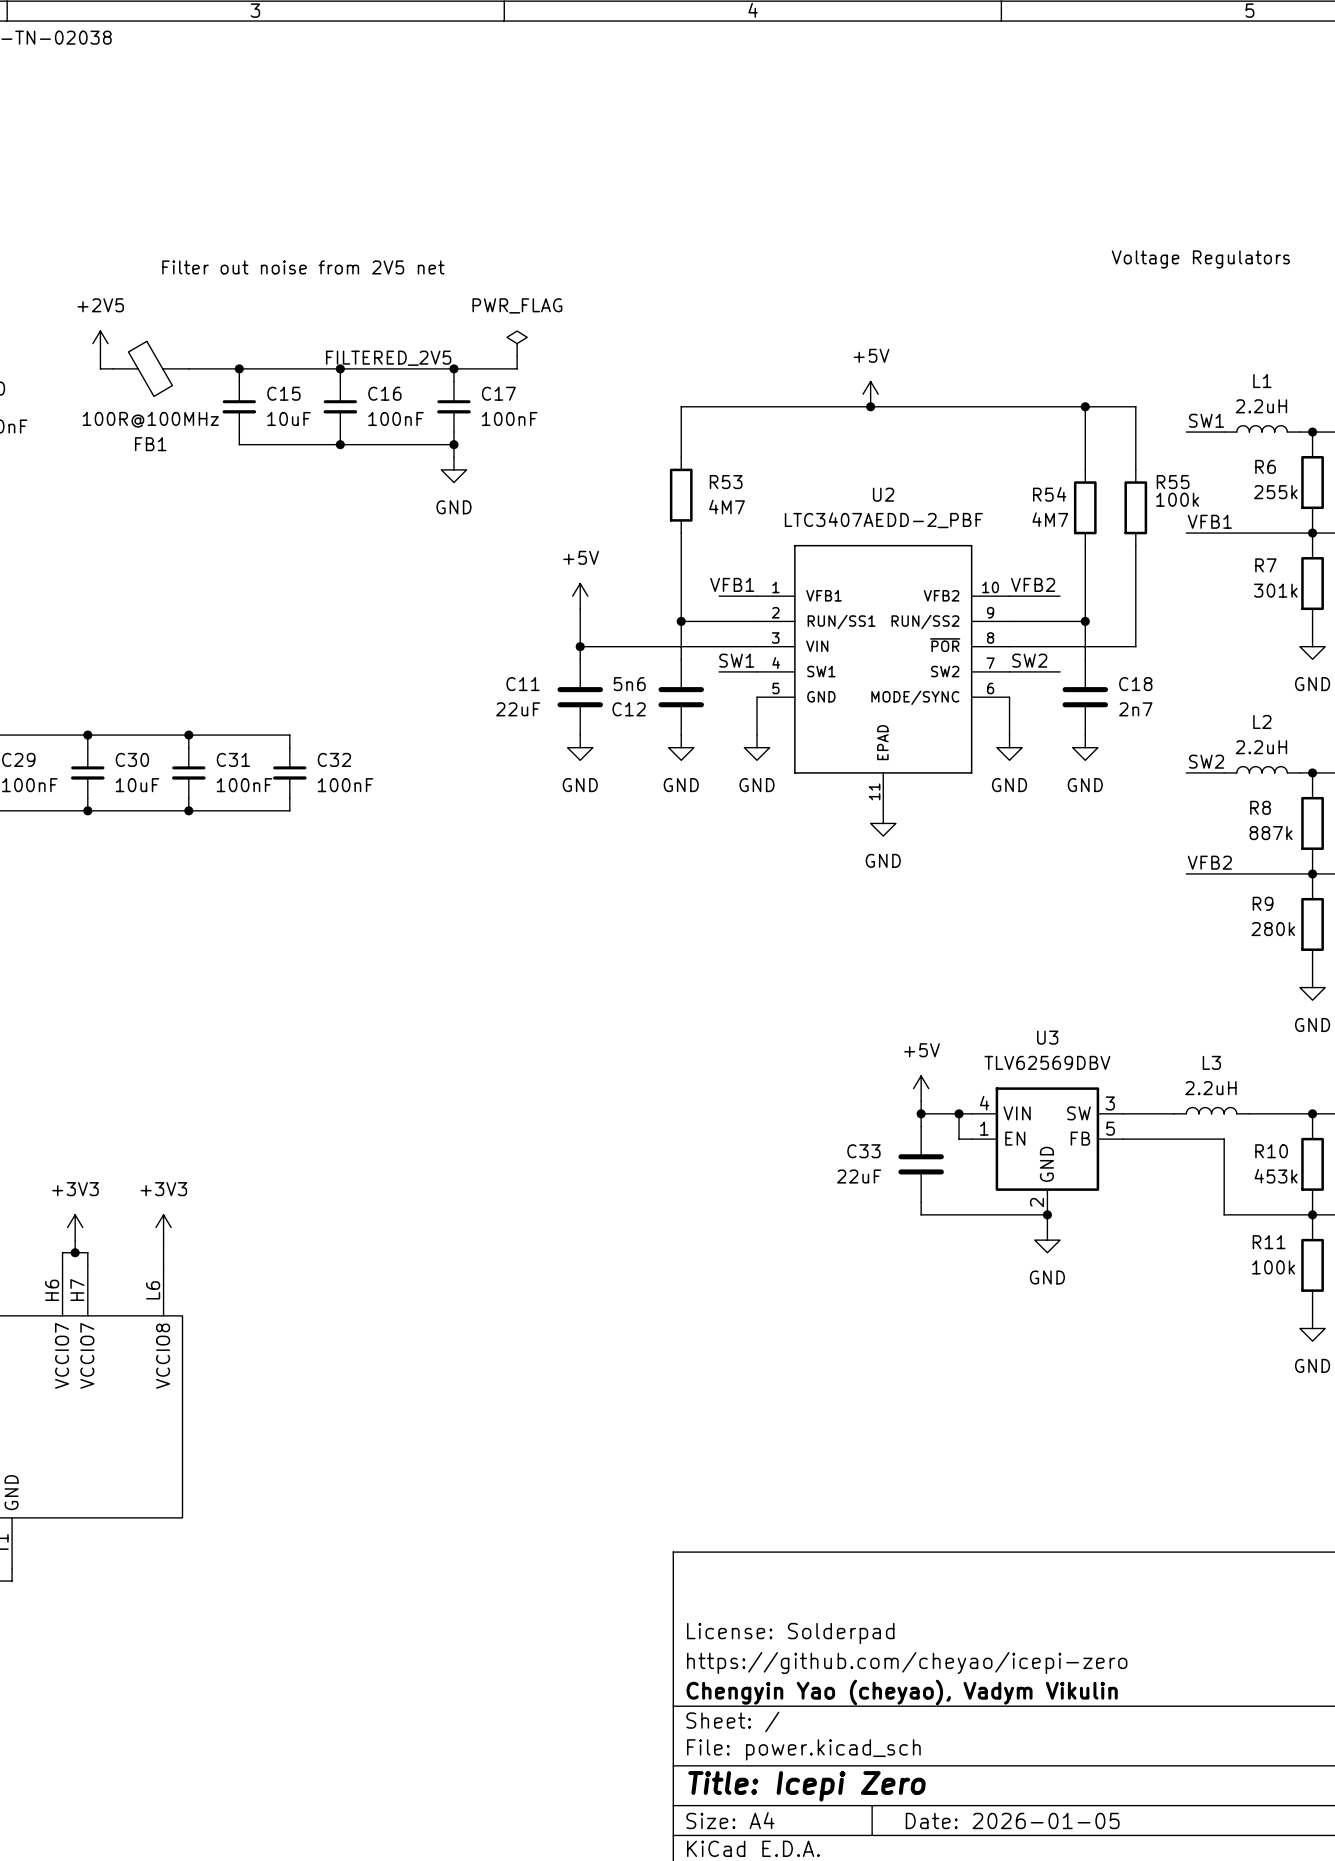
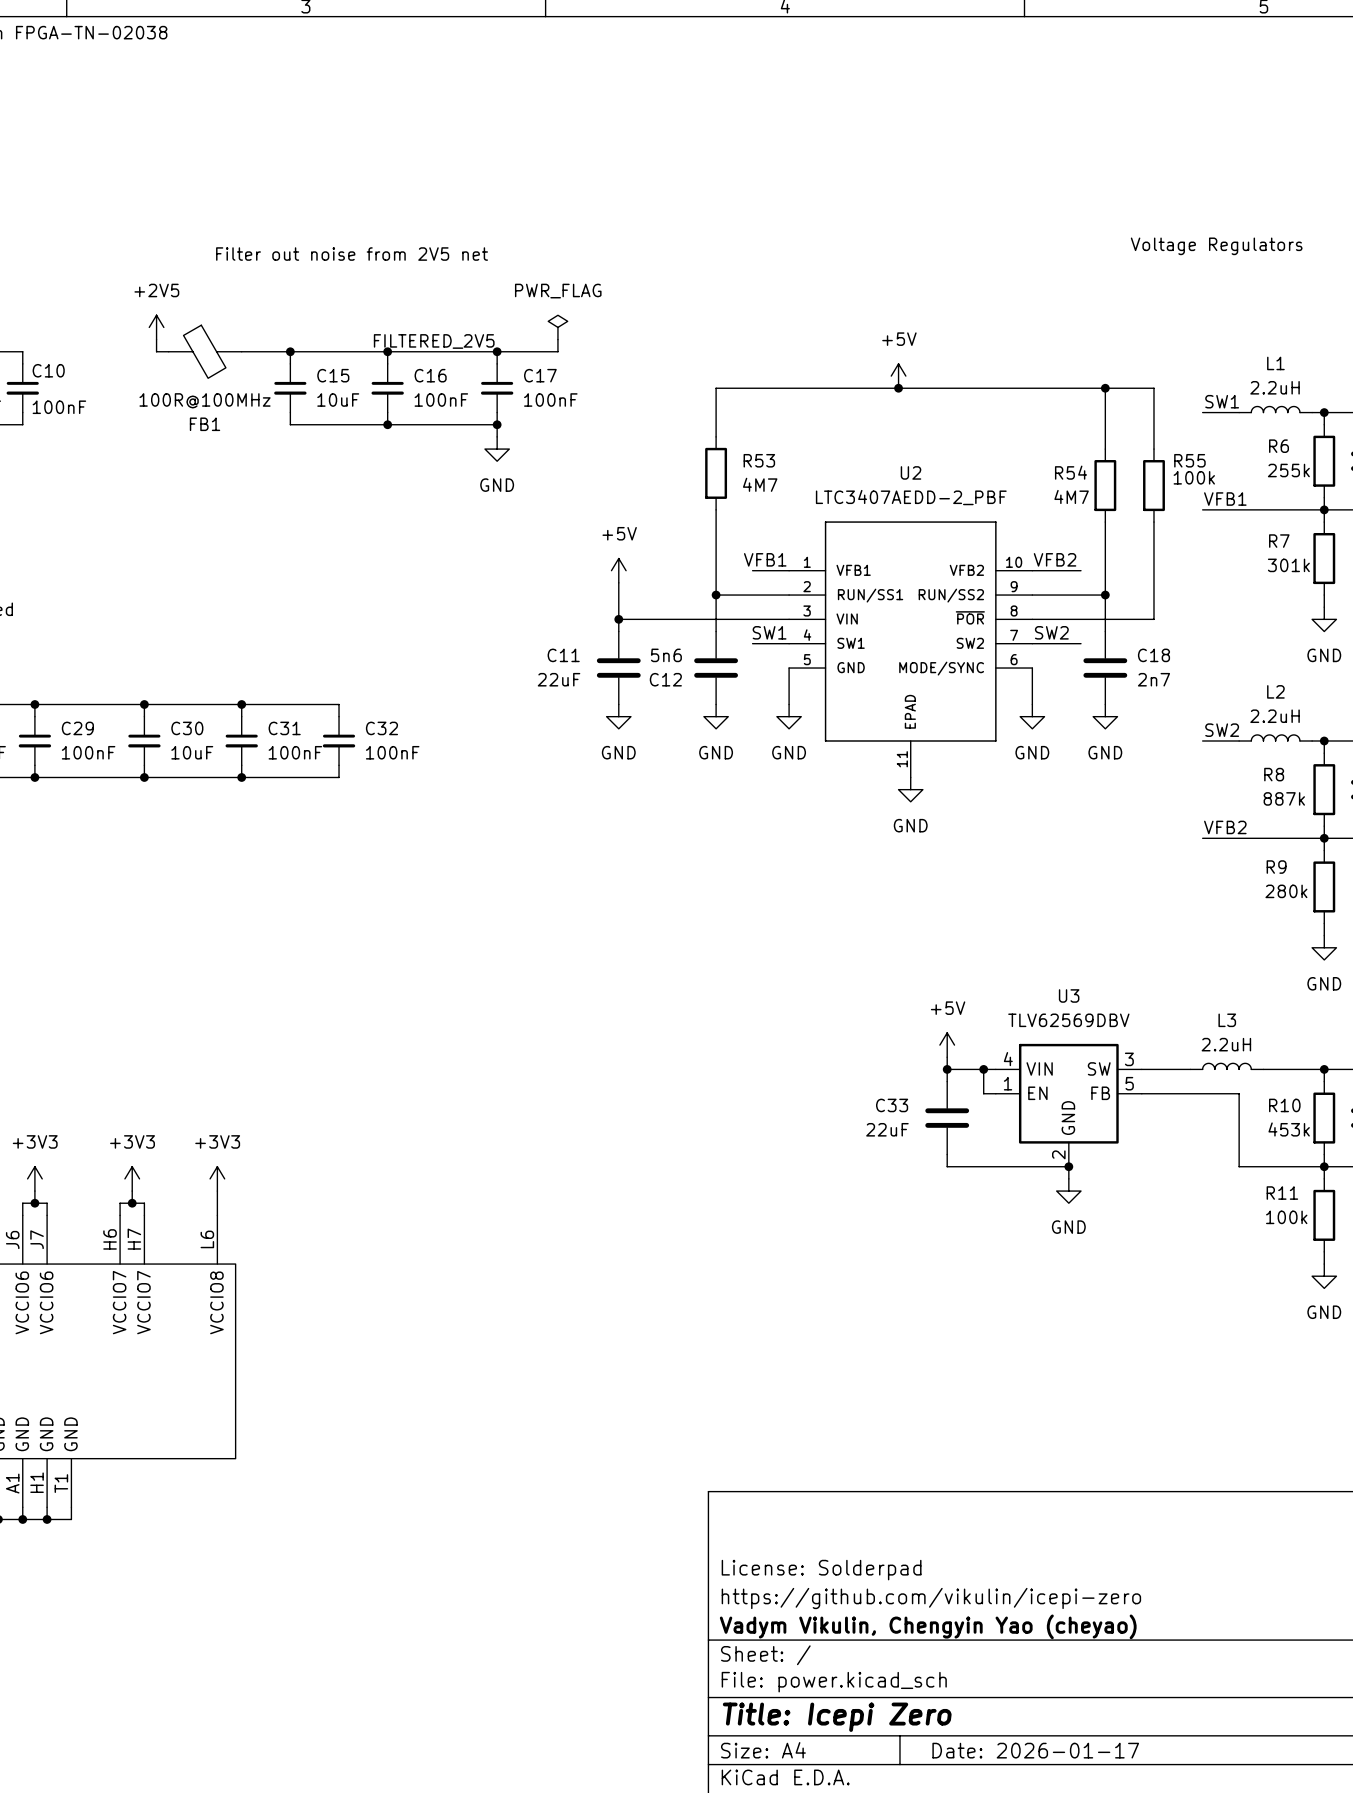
title block: https://github.com/cheyao/icepi-zero (907, 1663) -> https://github.com/vikulin/icepi-zero (931, 1598)
title block: Chengyin Yao (cheyao), Vadym Vikulin (902, 1692) -> Vadym Vikulin, Chengyin Yao (cheyao) (928, 1626)
title block: Date: 2026-01-05 (1012, 1820) -> Date: 2026-01-17 (1035, 1750)

